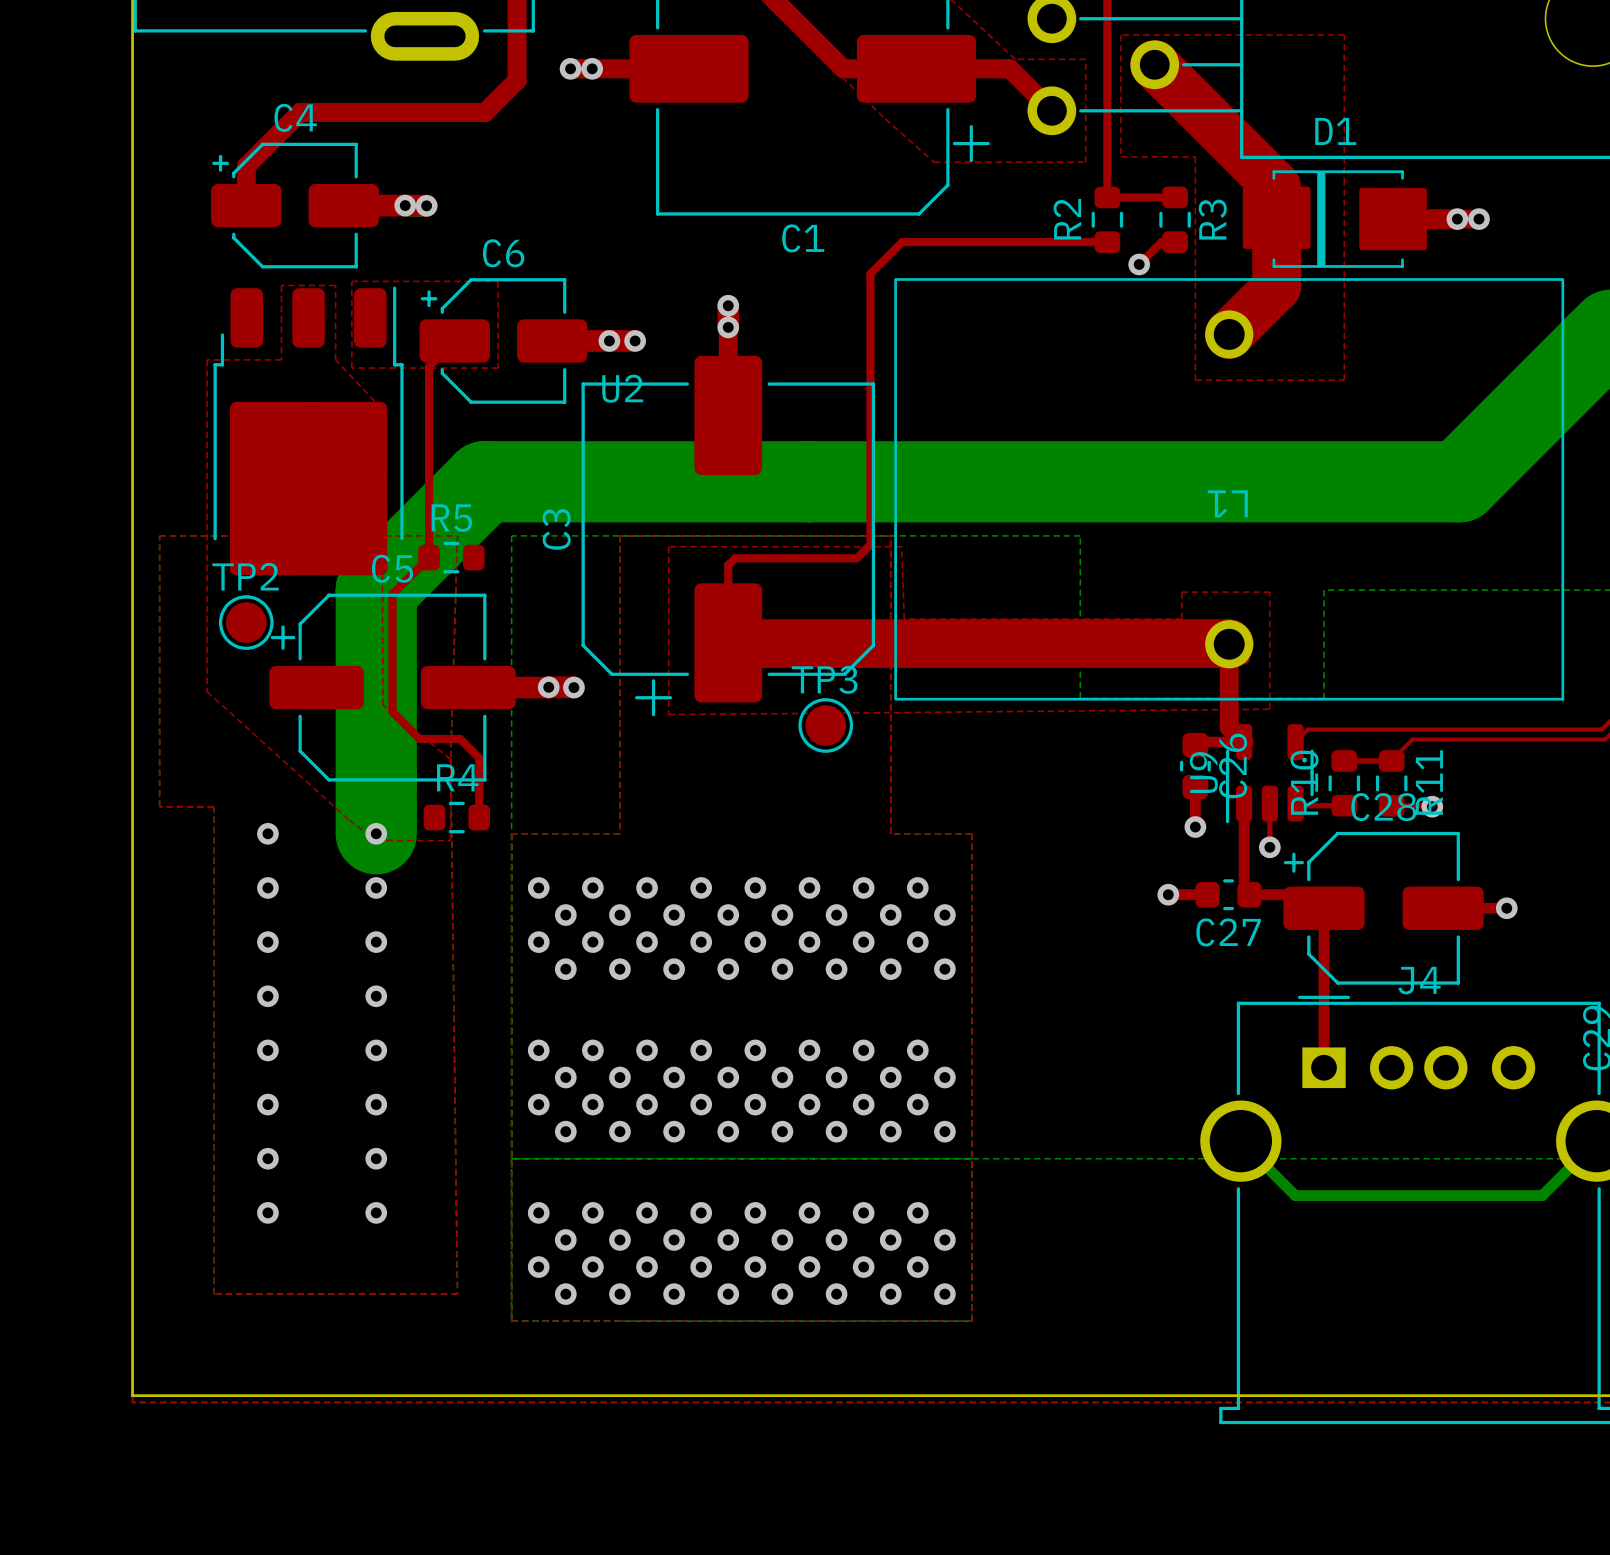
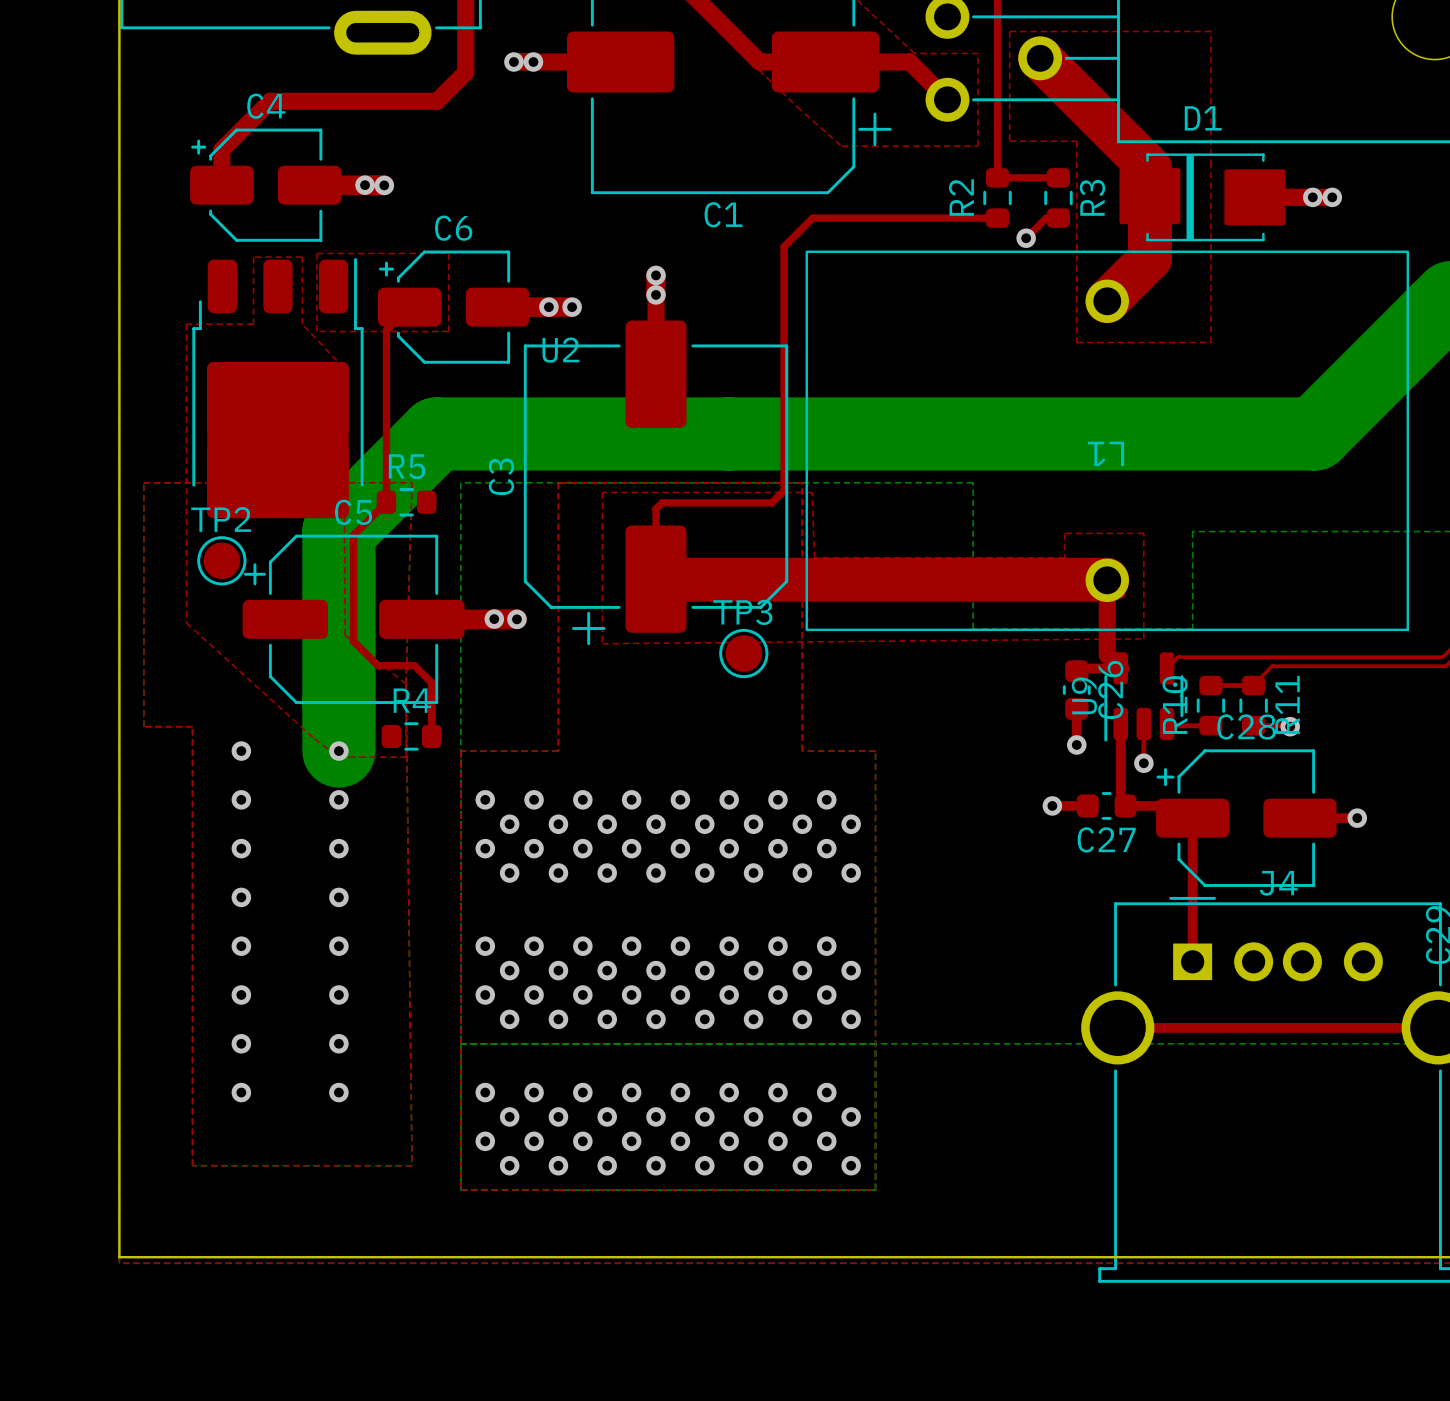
top track: none -> (1117, 1027) (1438, 1027)
bottom track: (1240, 1141) (1295, 1195) (1542, 1195) (1596, 1141) -> none

